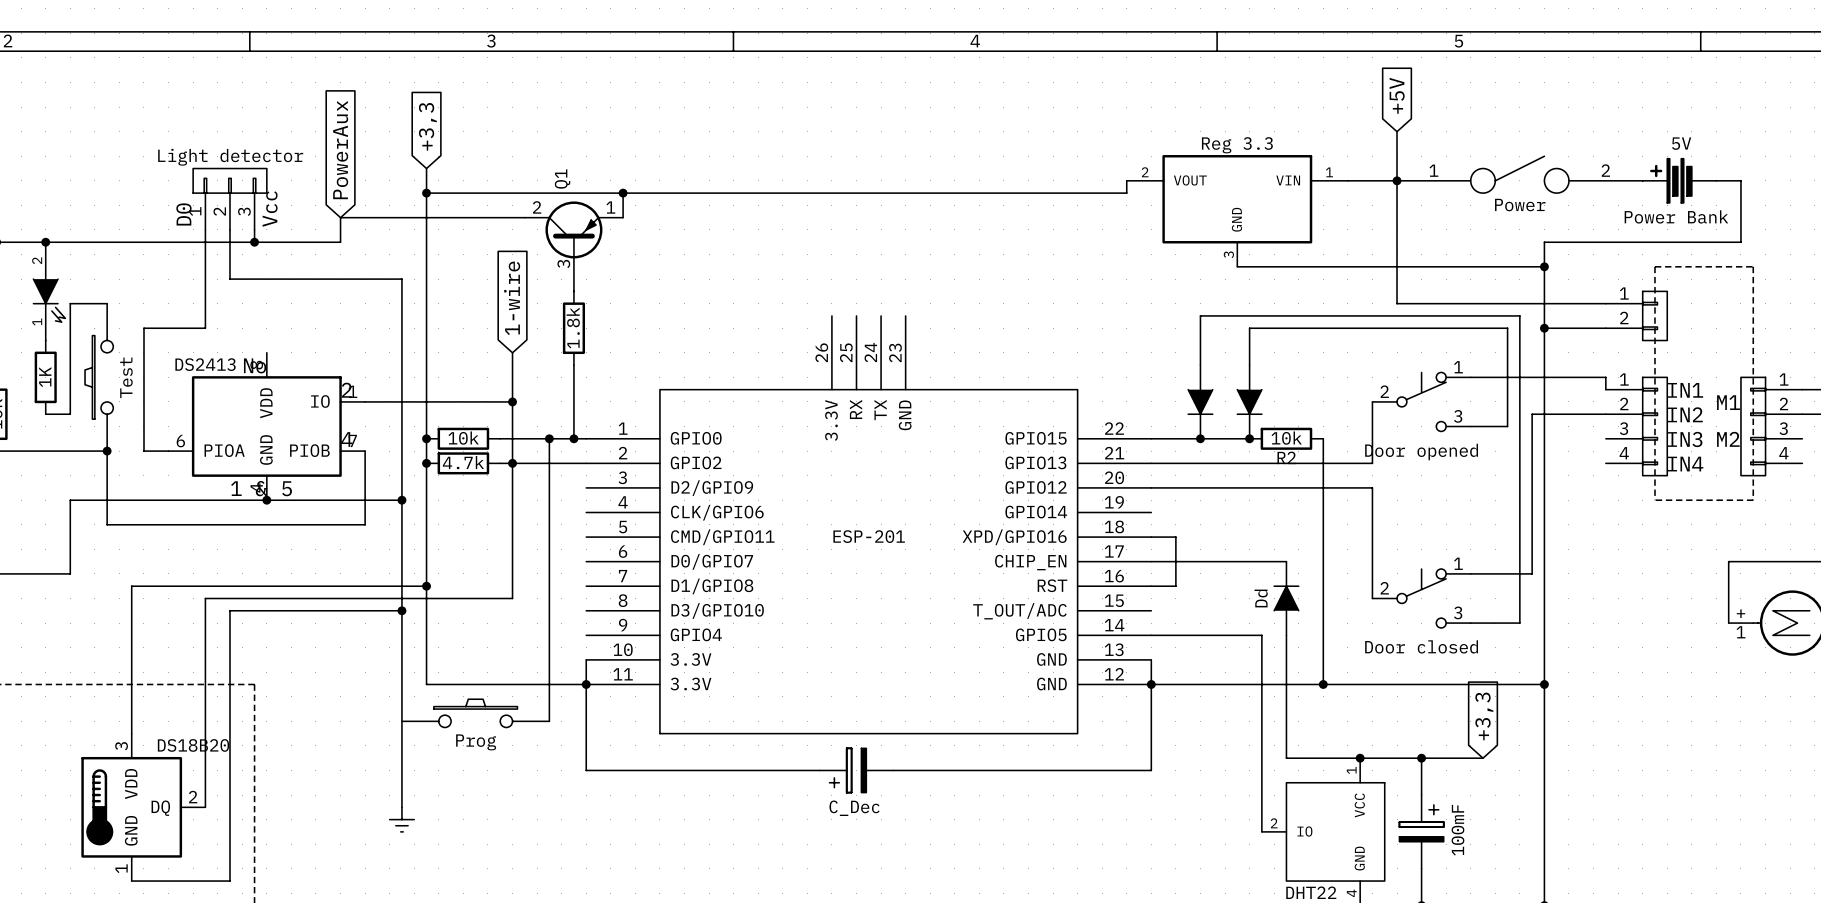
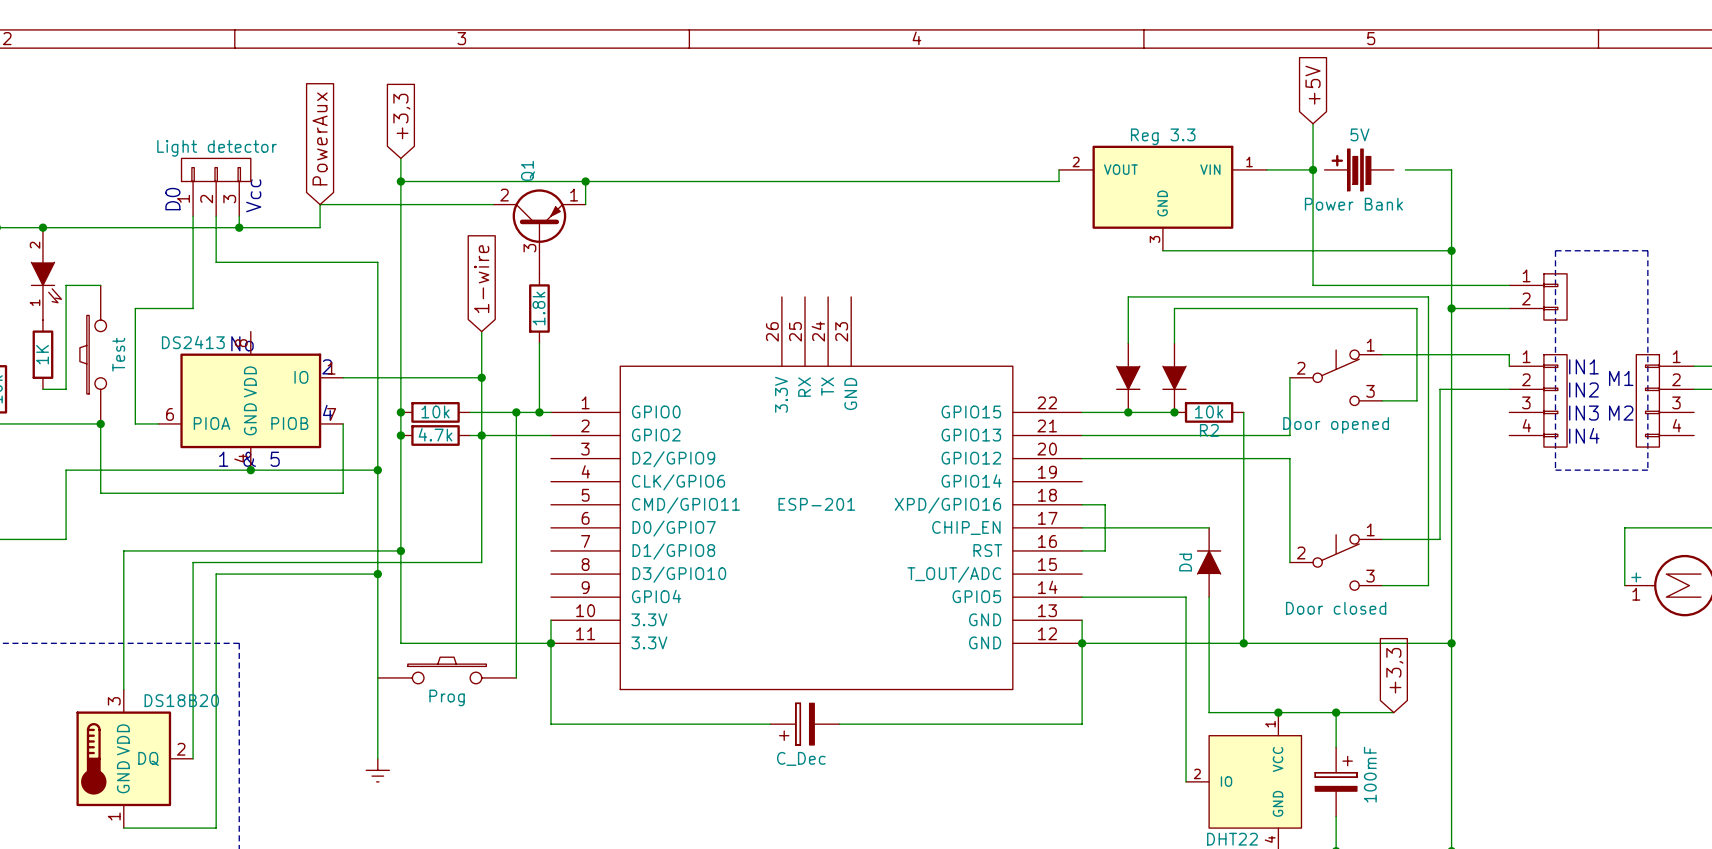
part: Power (1519, 174) -> none
5V position: (1679, 180) -> (1359, 169)
wire: (1716, 180) (1740, 180) (1740, 242) (1544, 242) -> (1405, 169) (1451, 169) (1451, 227)

